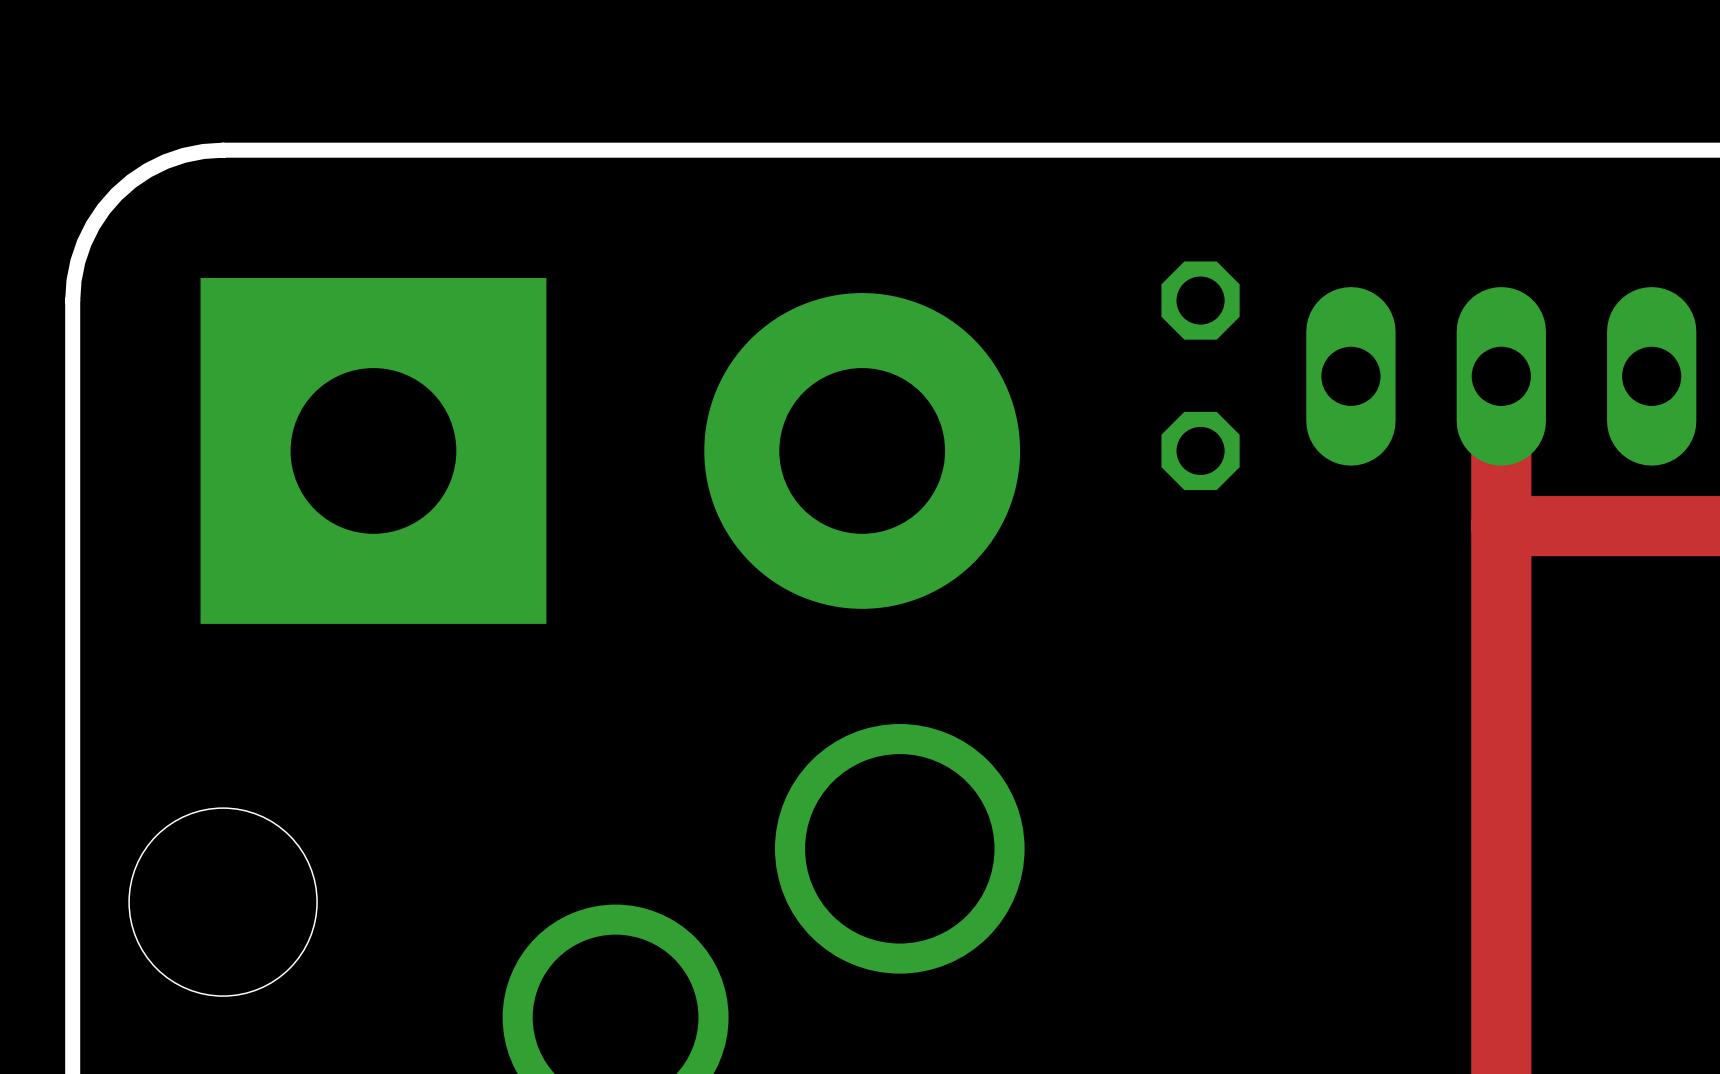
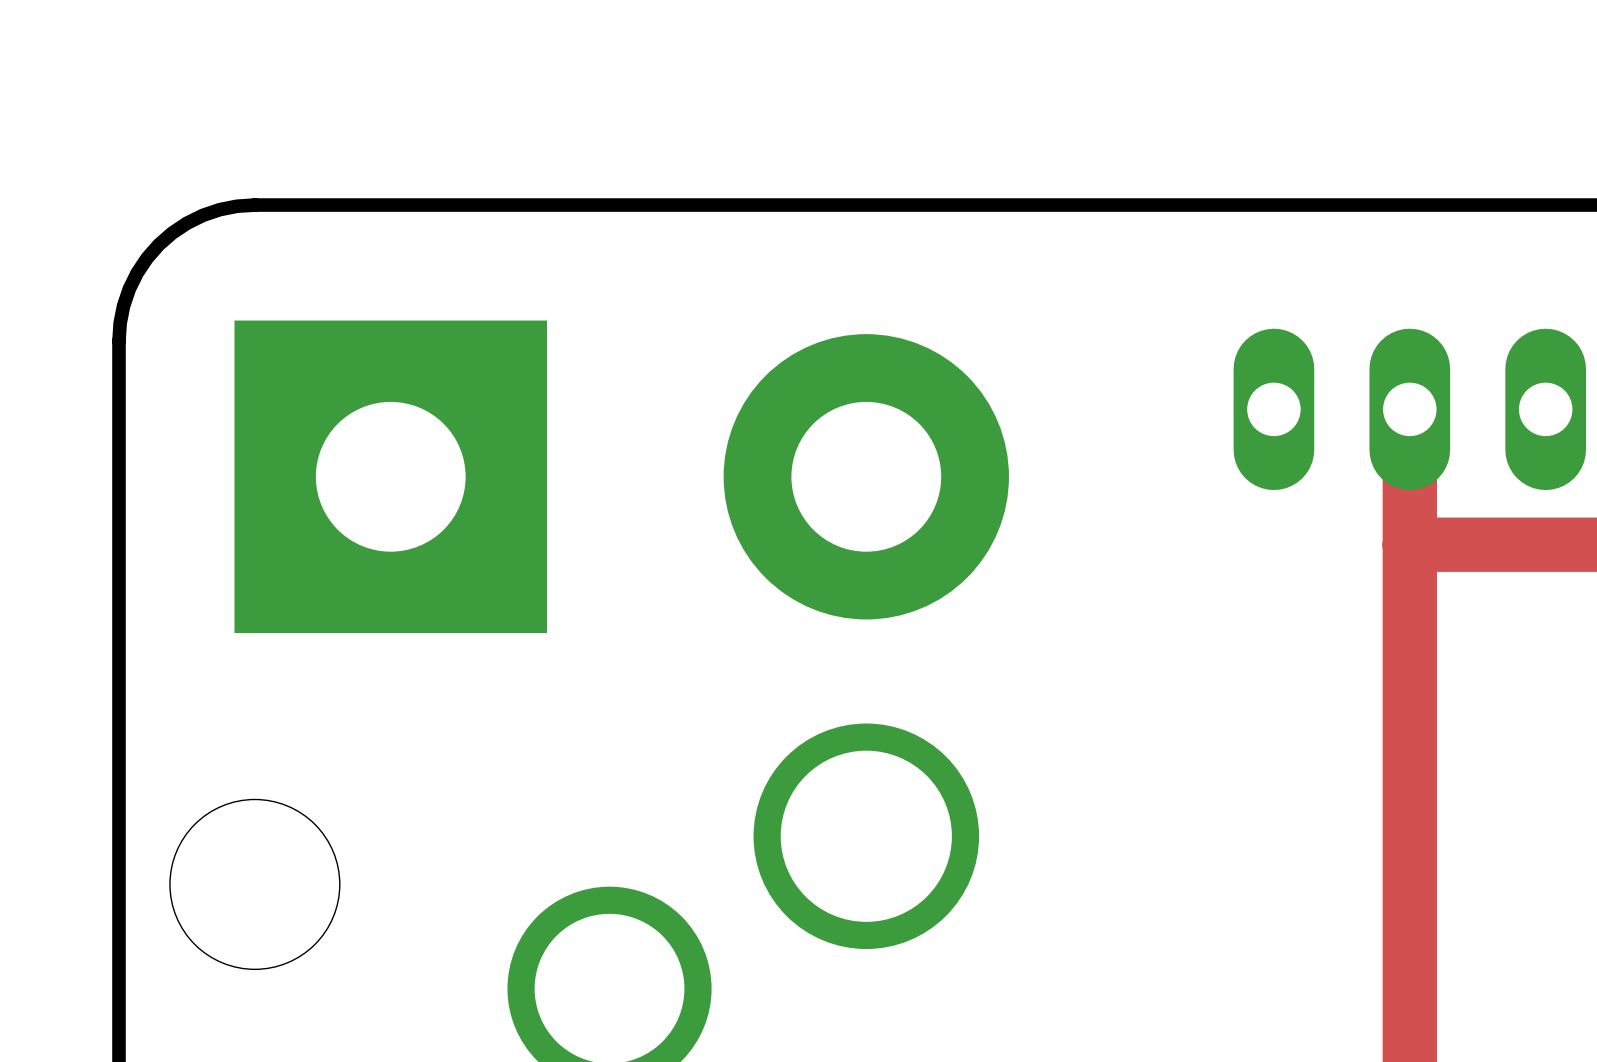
part: (1200, 375) -> none
part position: (862, 450) -> (866, 476)

